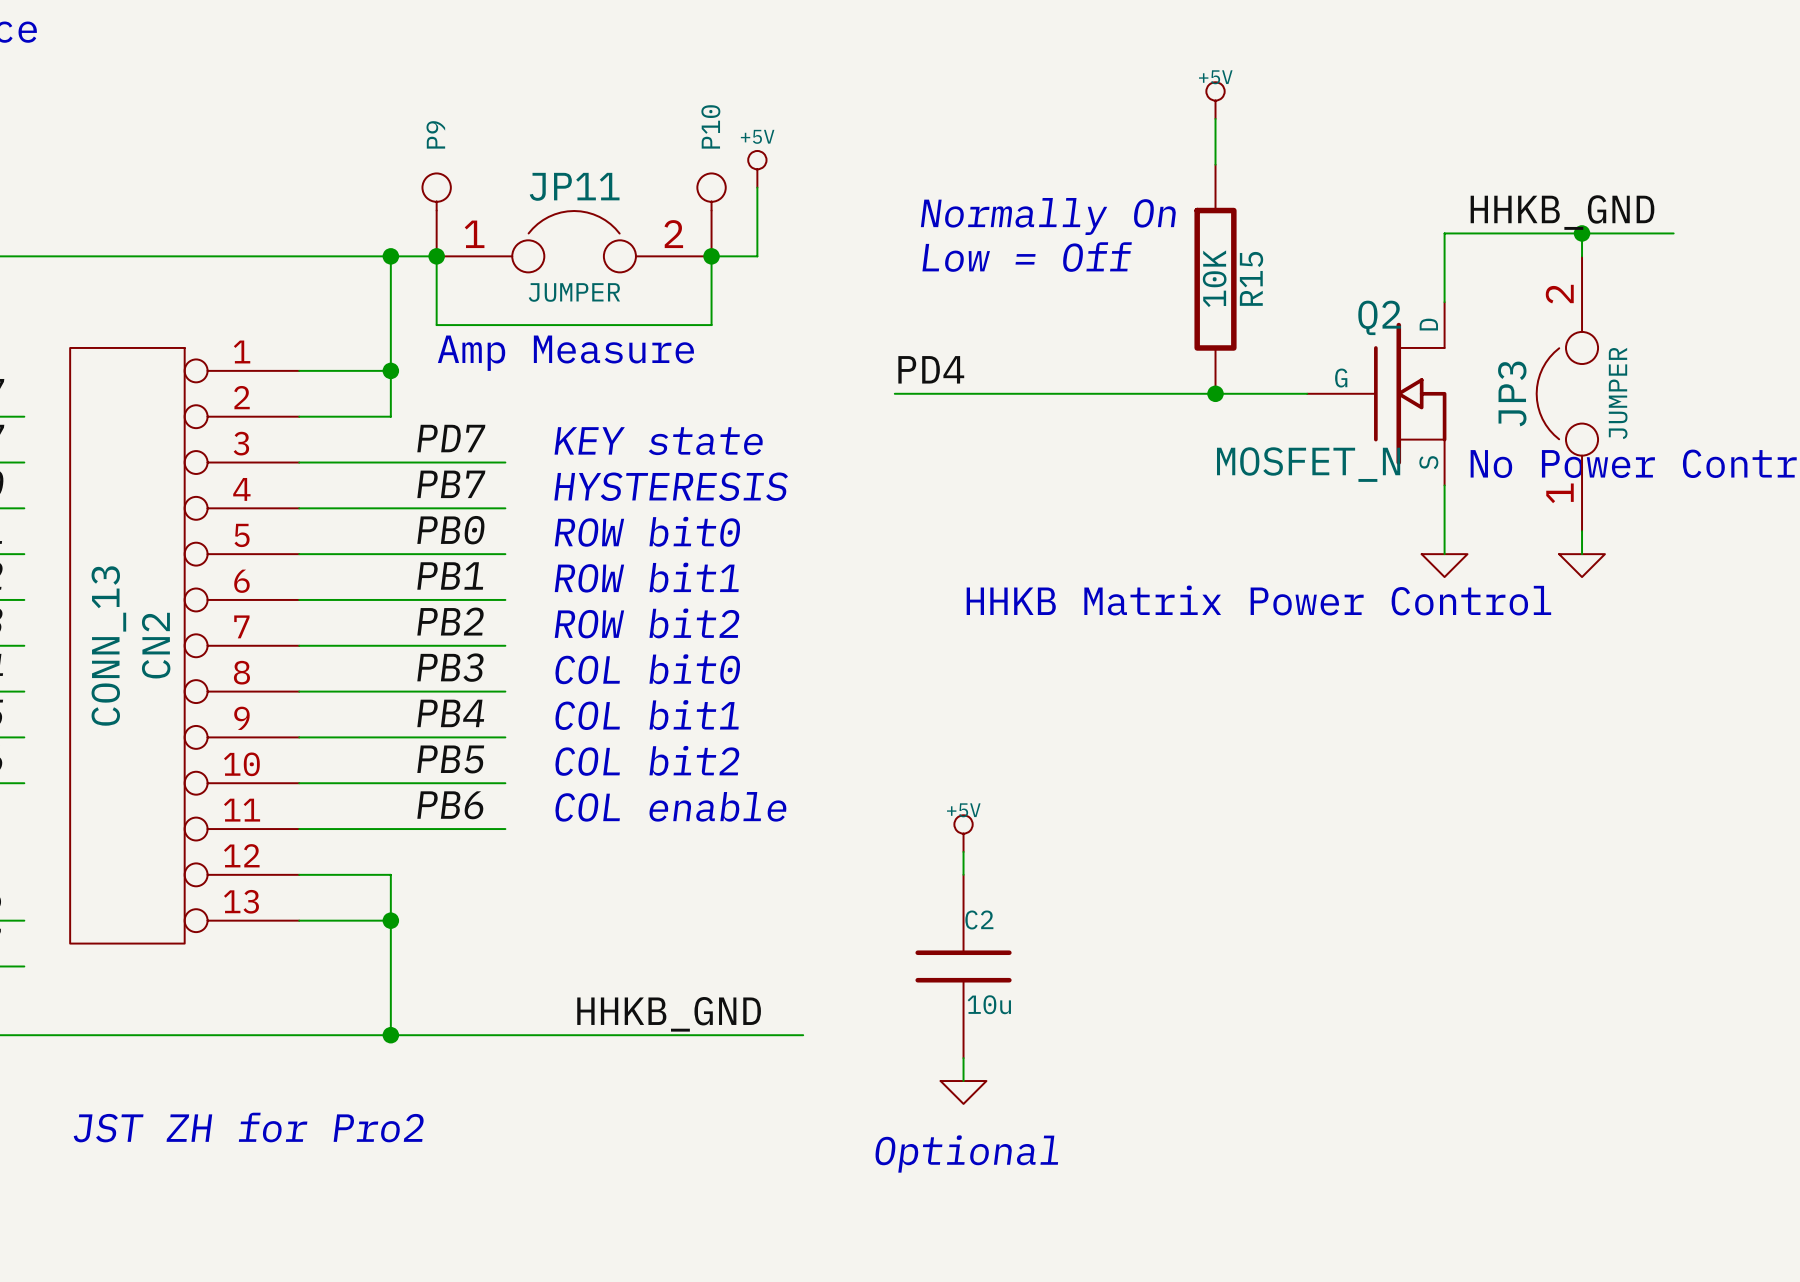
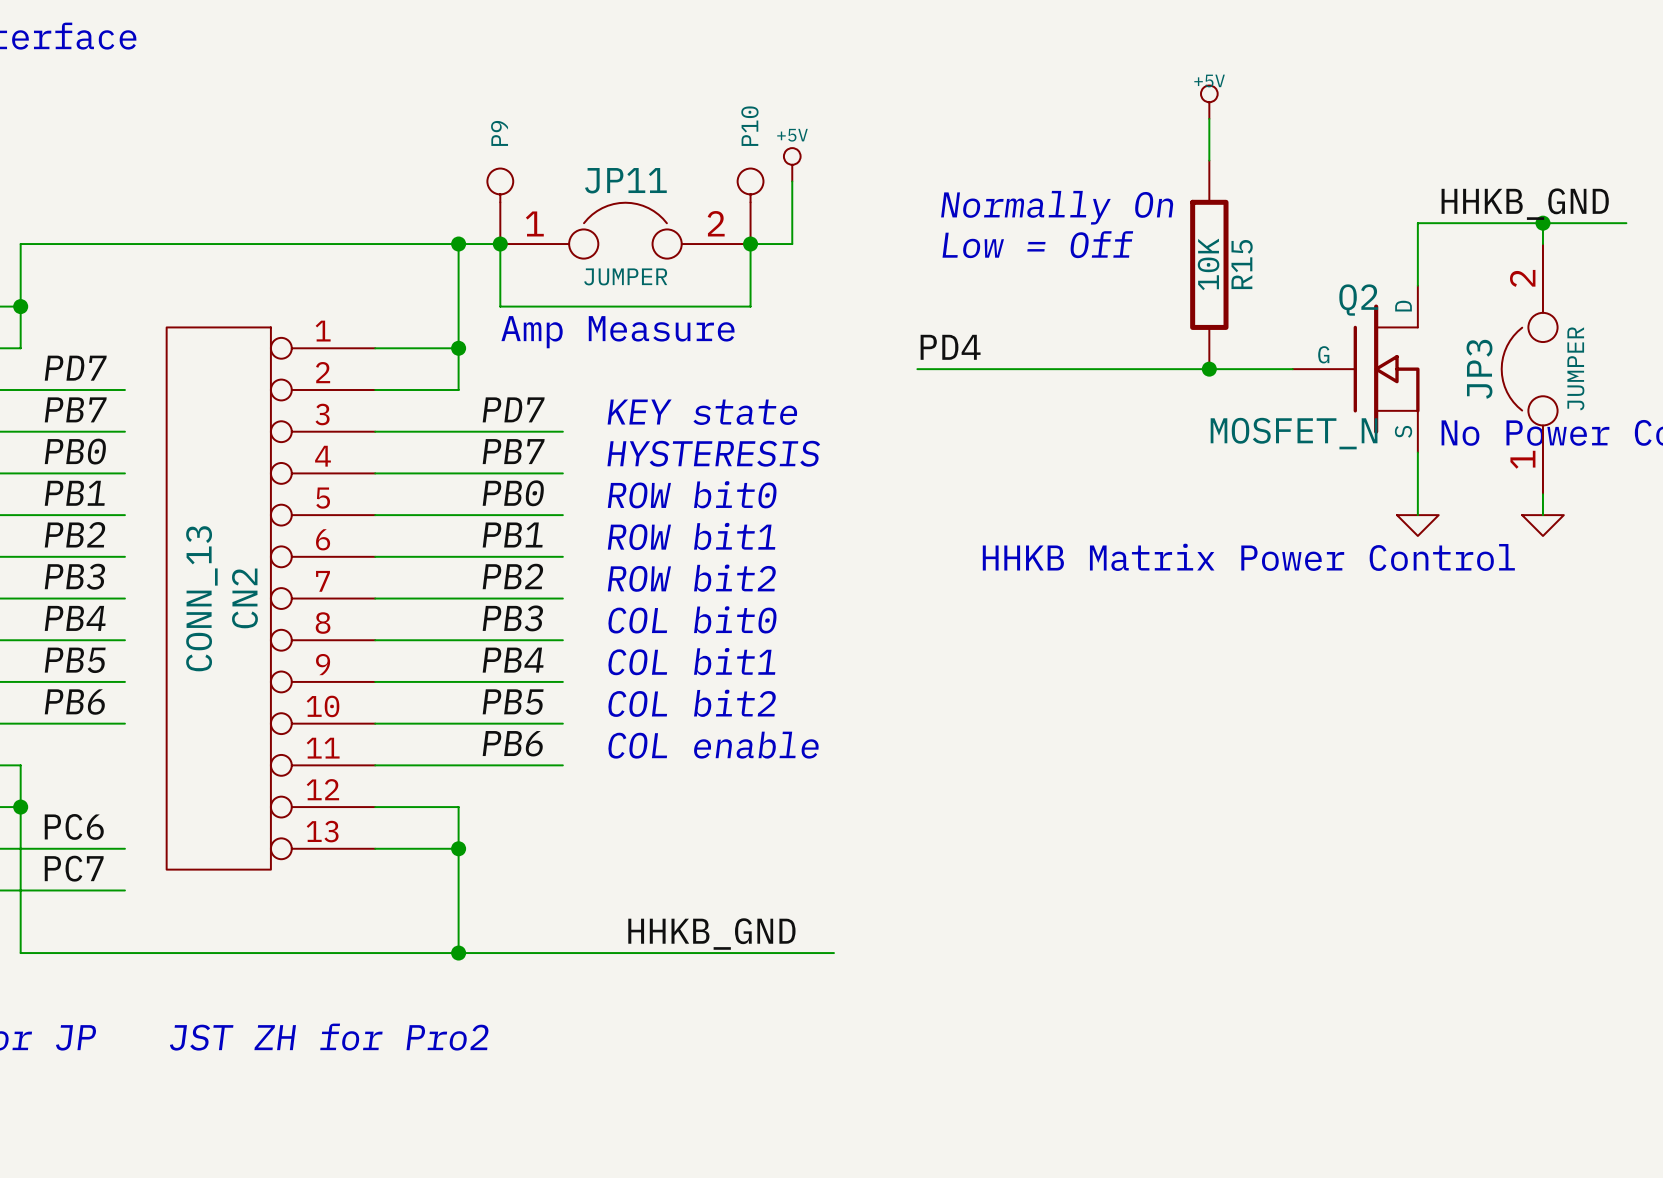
power symbol: +5V (963, 833) -> none
wire: (963, 851) (963, 874) -> none
C2: 10u (963, 966) -> none
wire: (963, 1058) (963, 1081) -> none
power symbol: (963, 1092) -> none
text: Optional (966, 1153) -> none

